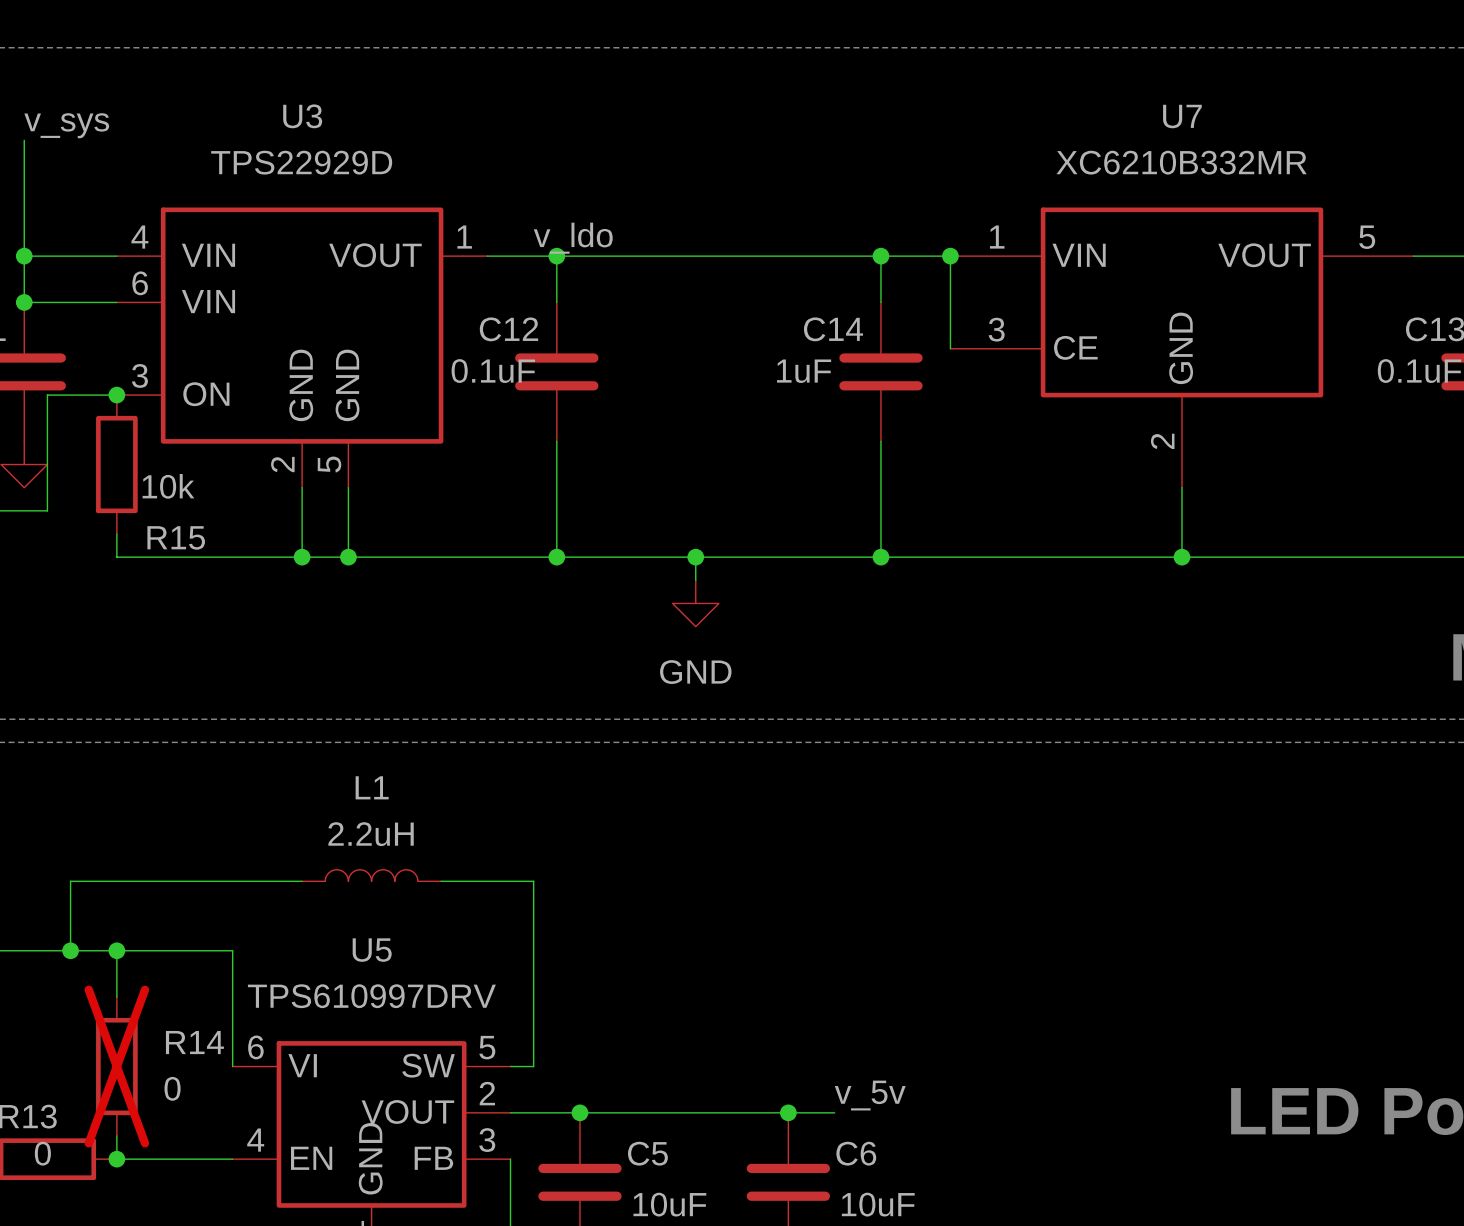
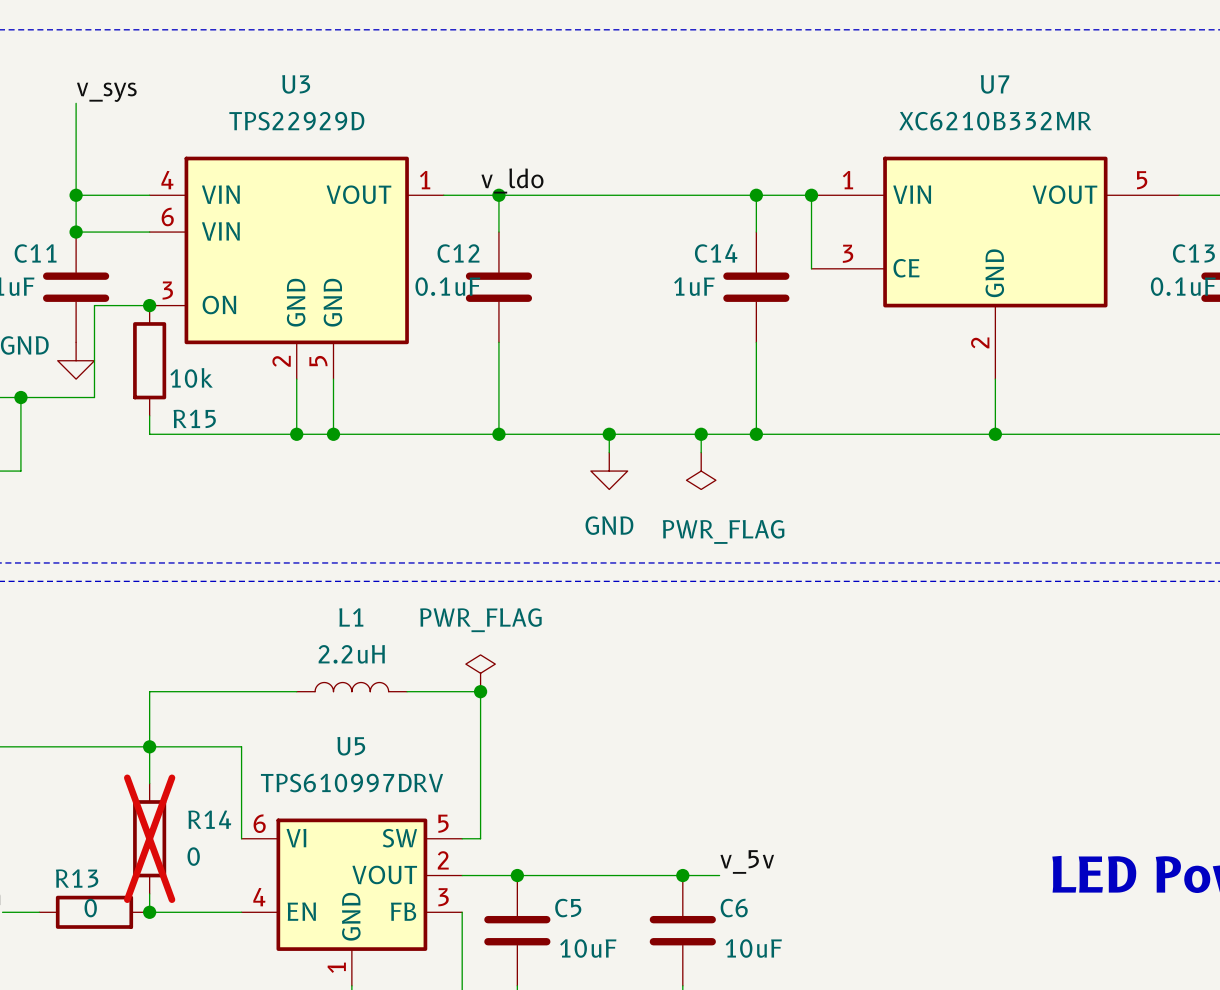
wire: none -> (701, 434) (701, 452)
junction: none -> (701, 434)
power symbol: none -> PWR_FLAG (701, 471)
power symbol: none -> PWR_FLAG (480, 673)
wire: (116, 881) (70, 881) (70, 950) -> (149, 691) (149, 746)
junction: none -> (480, 691)
junction: (70, 950) -> none

